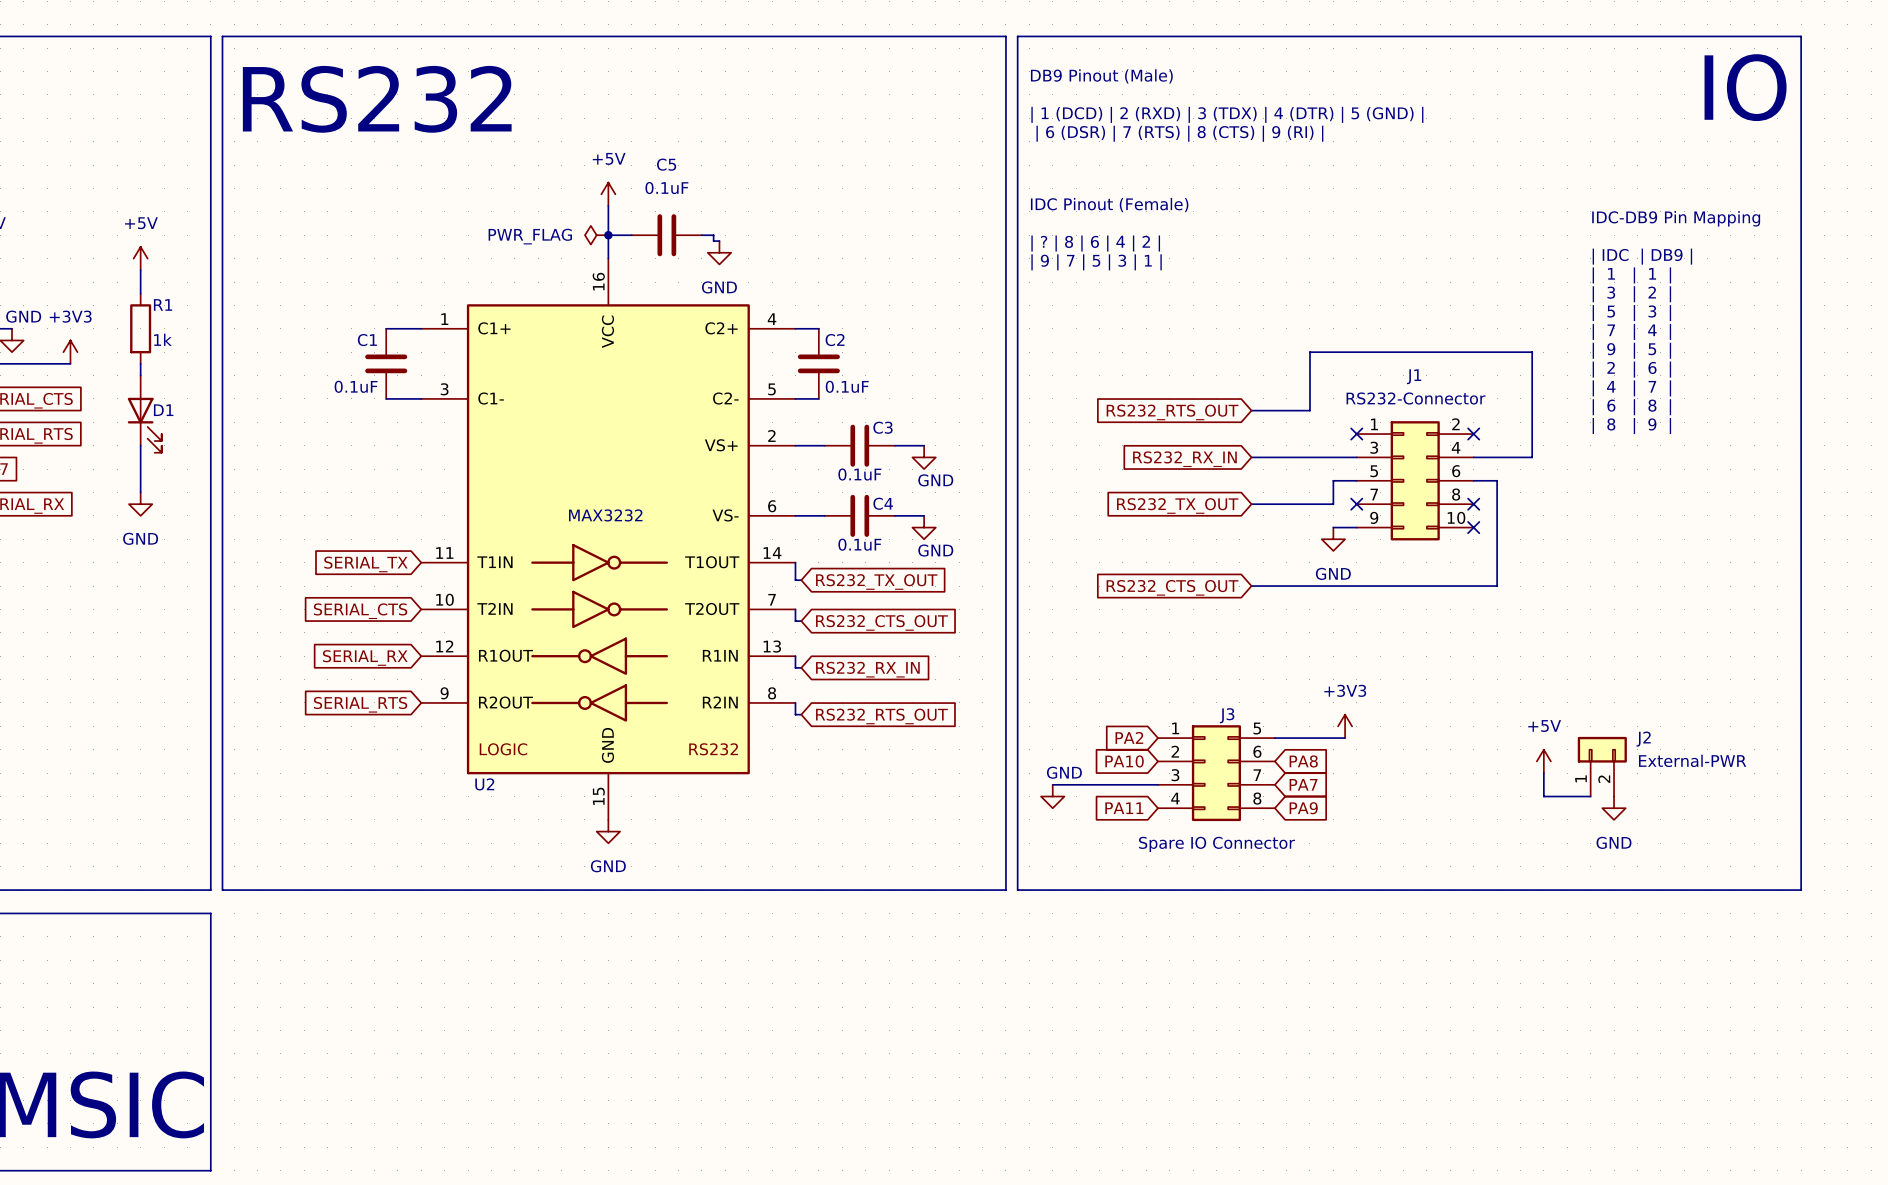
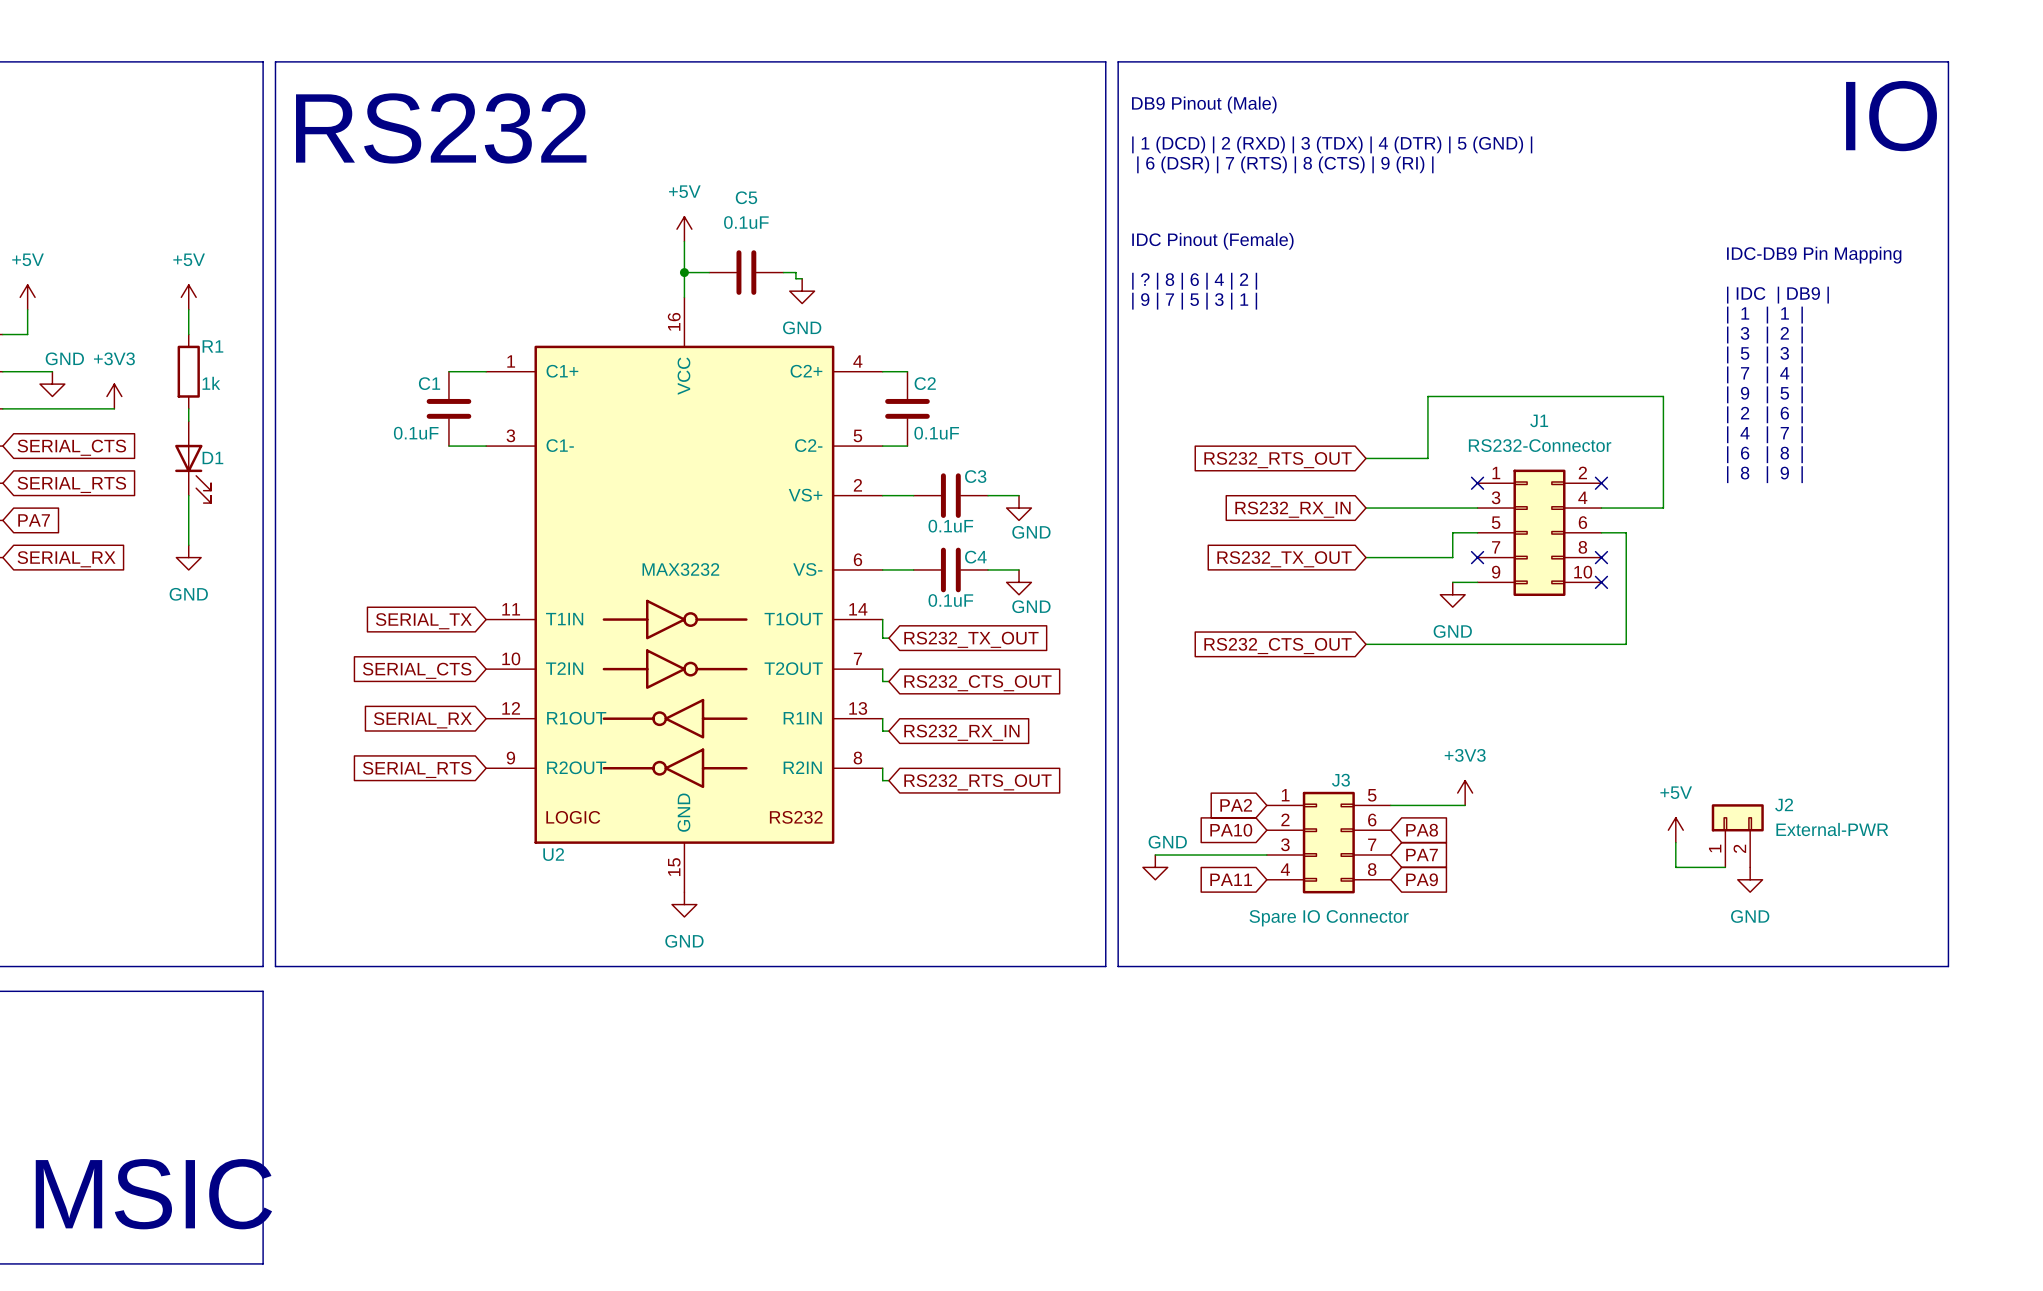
power symbol: PWR_FLAG (596, 235) -> none

